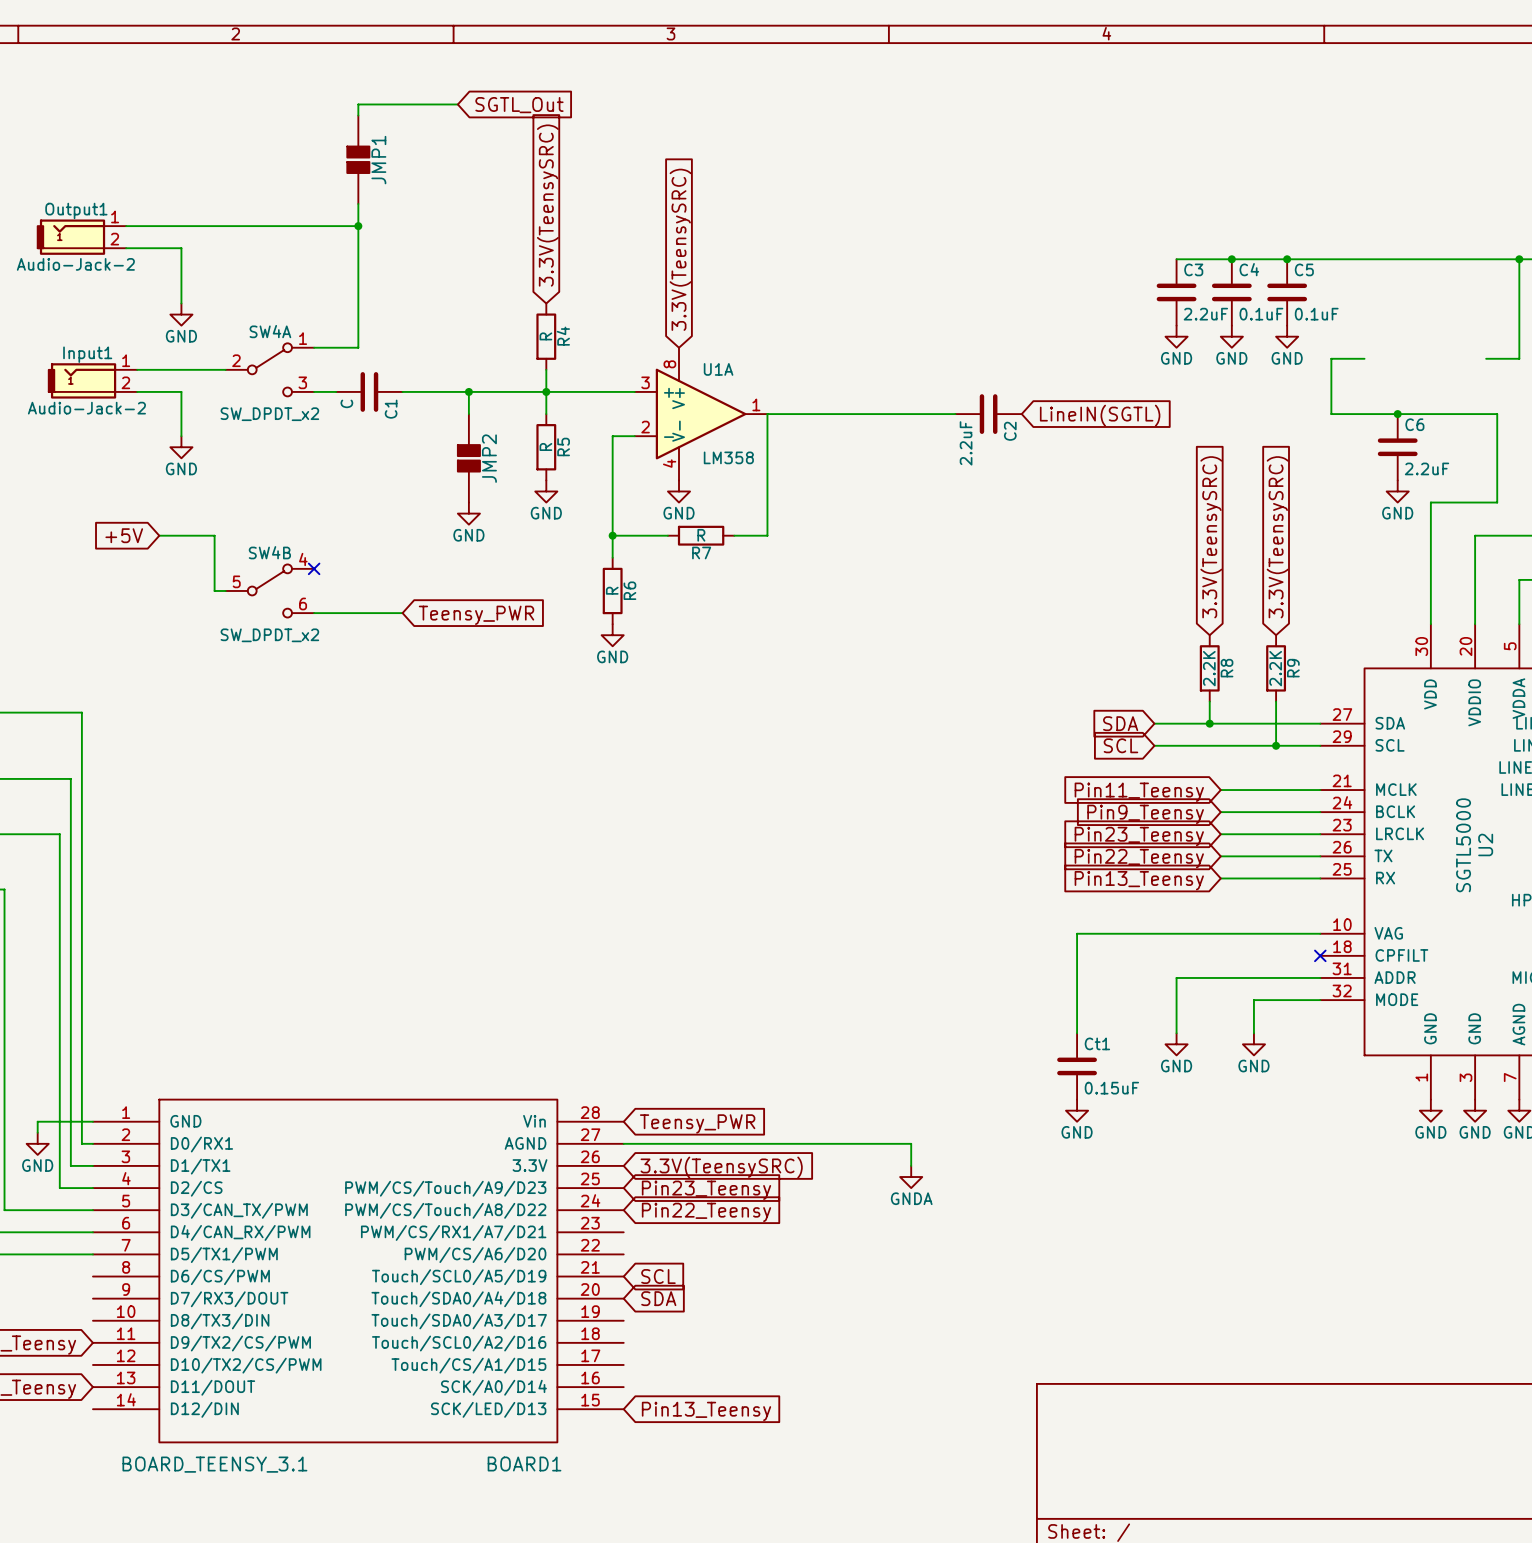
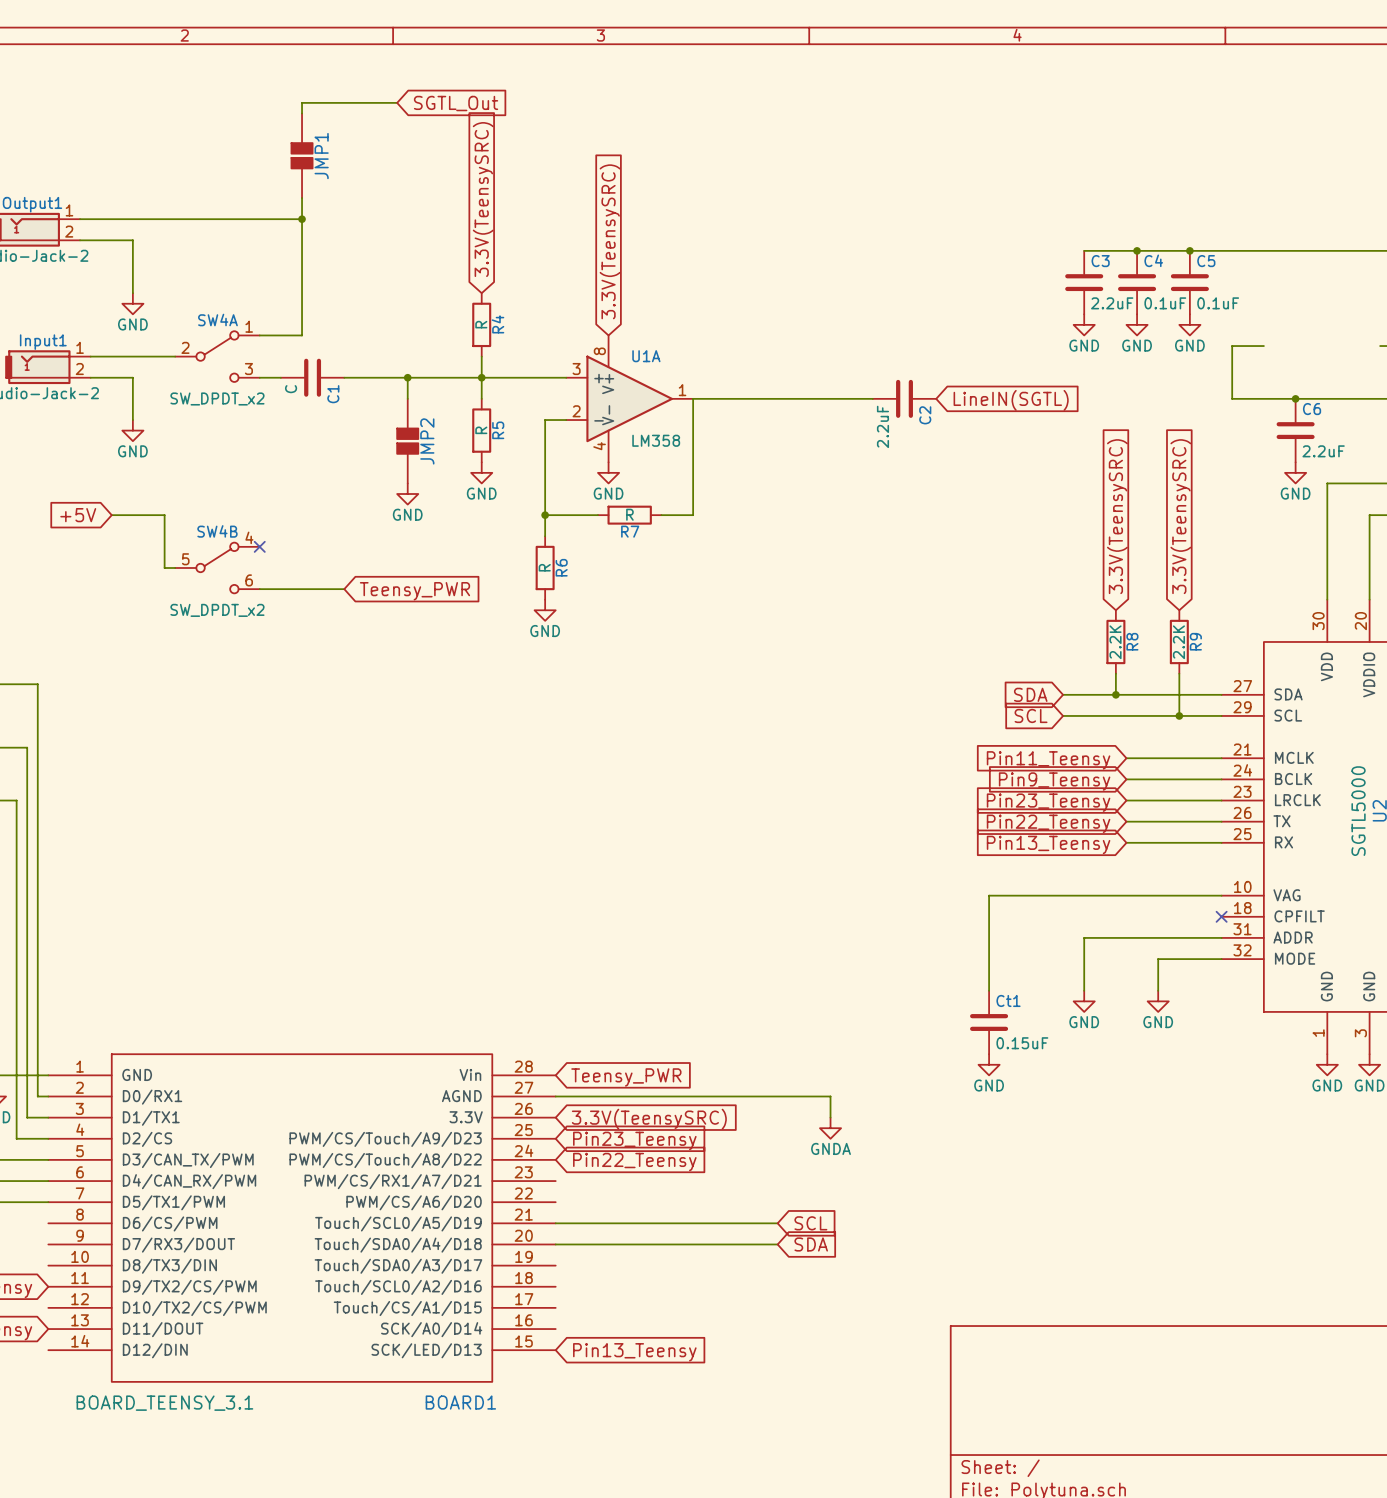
wire: none -> (555, 1223) (777, 1223)
global label: SCL (658, 1276) -> none
global label: none -> SCL (810, 1223)
wire: none -> (555, 1244) (777, 1244)
global label: SDA (658, 1298) -> none
global label: none -> SDA (811, 1244)

